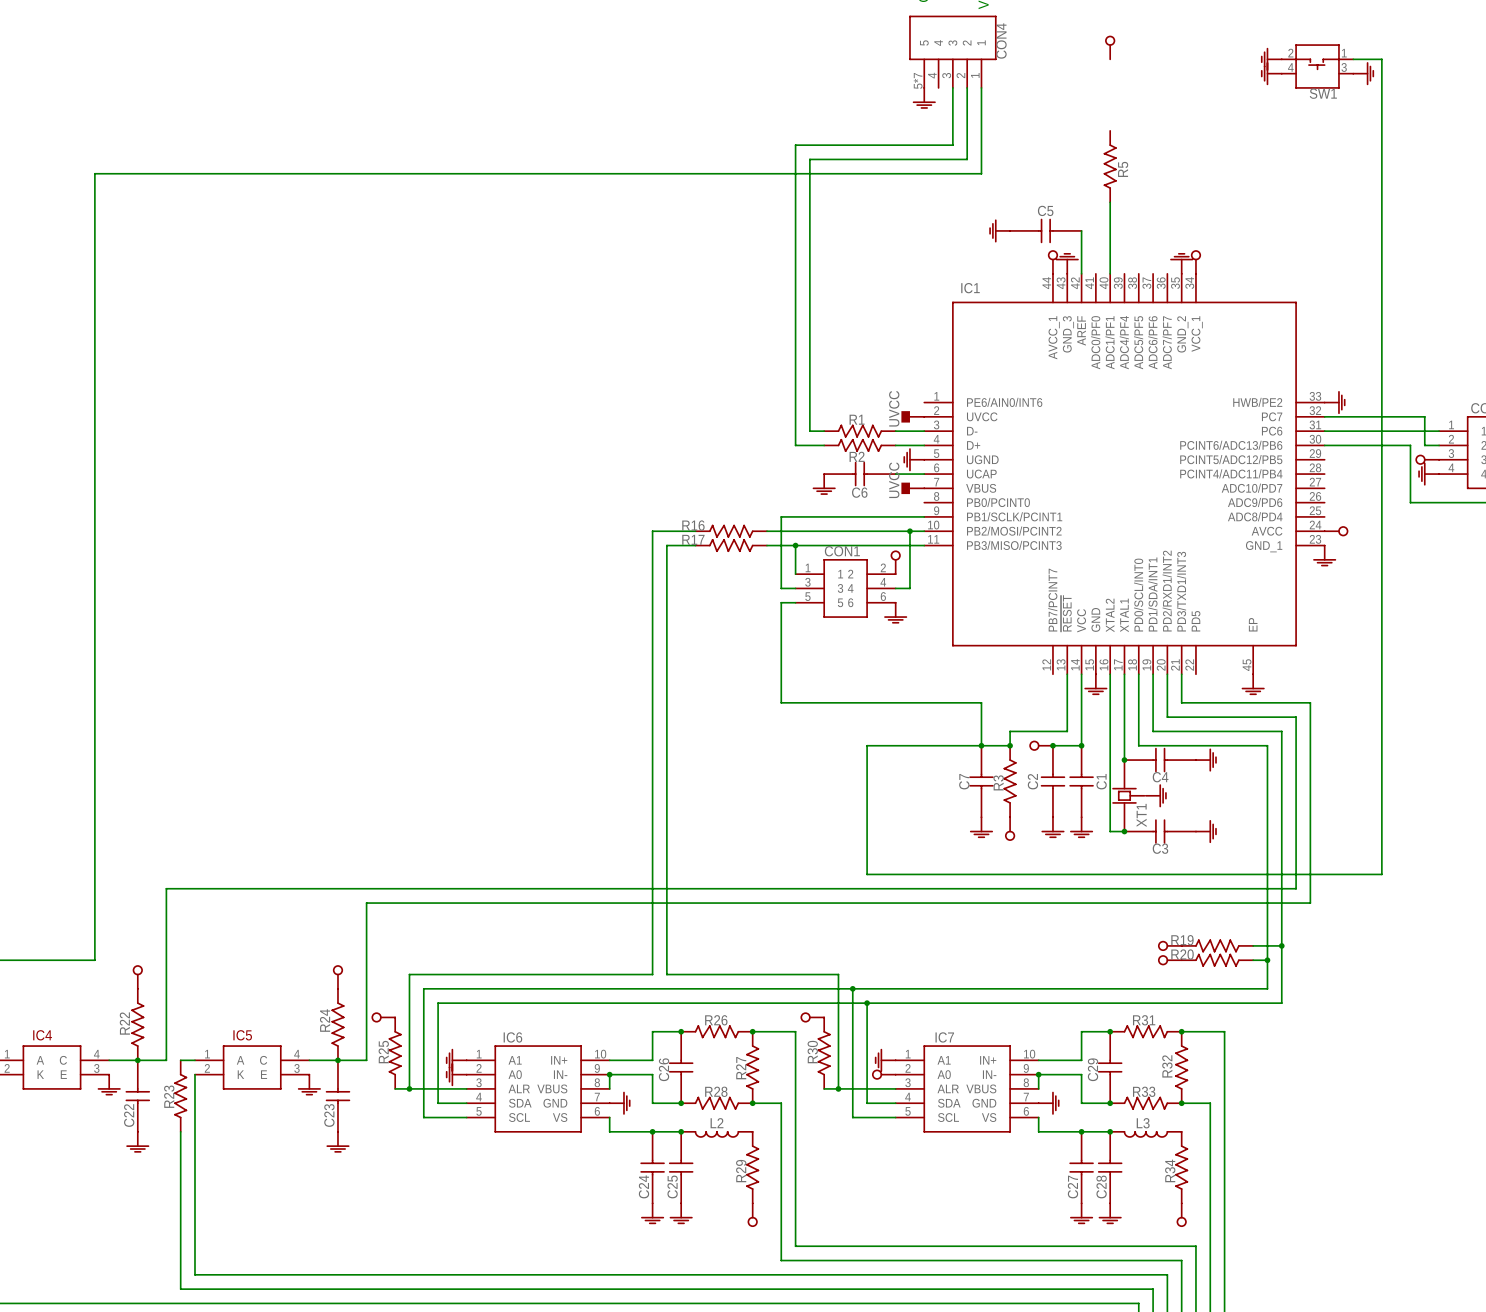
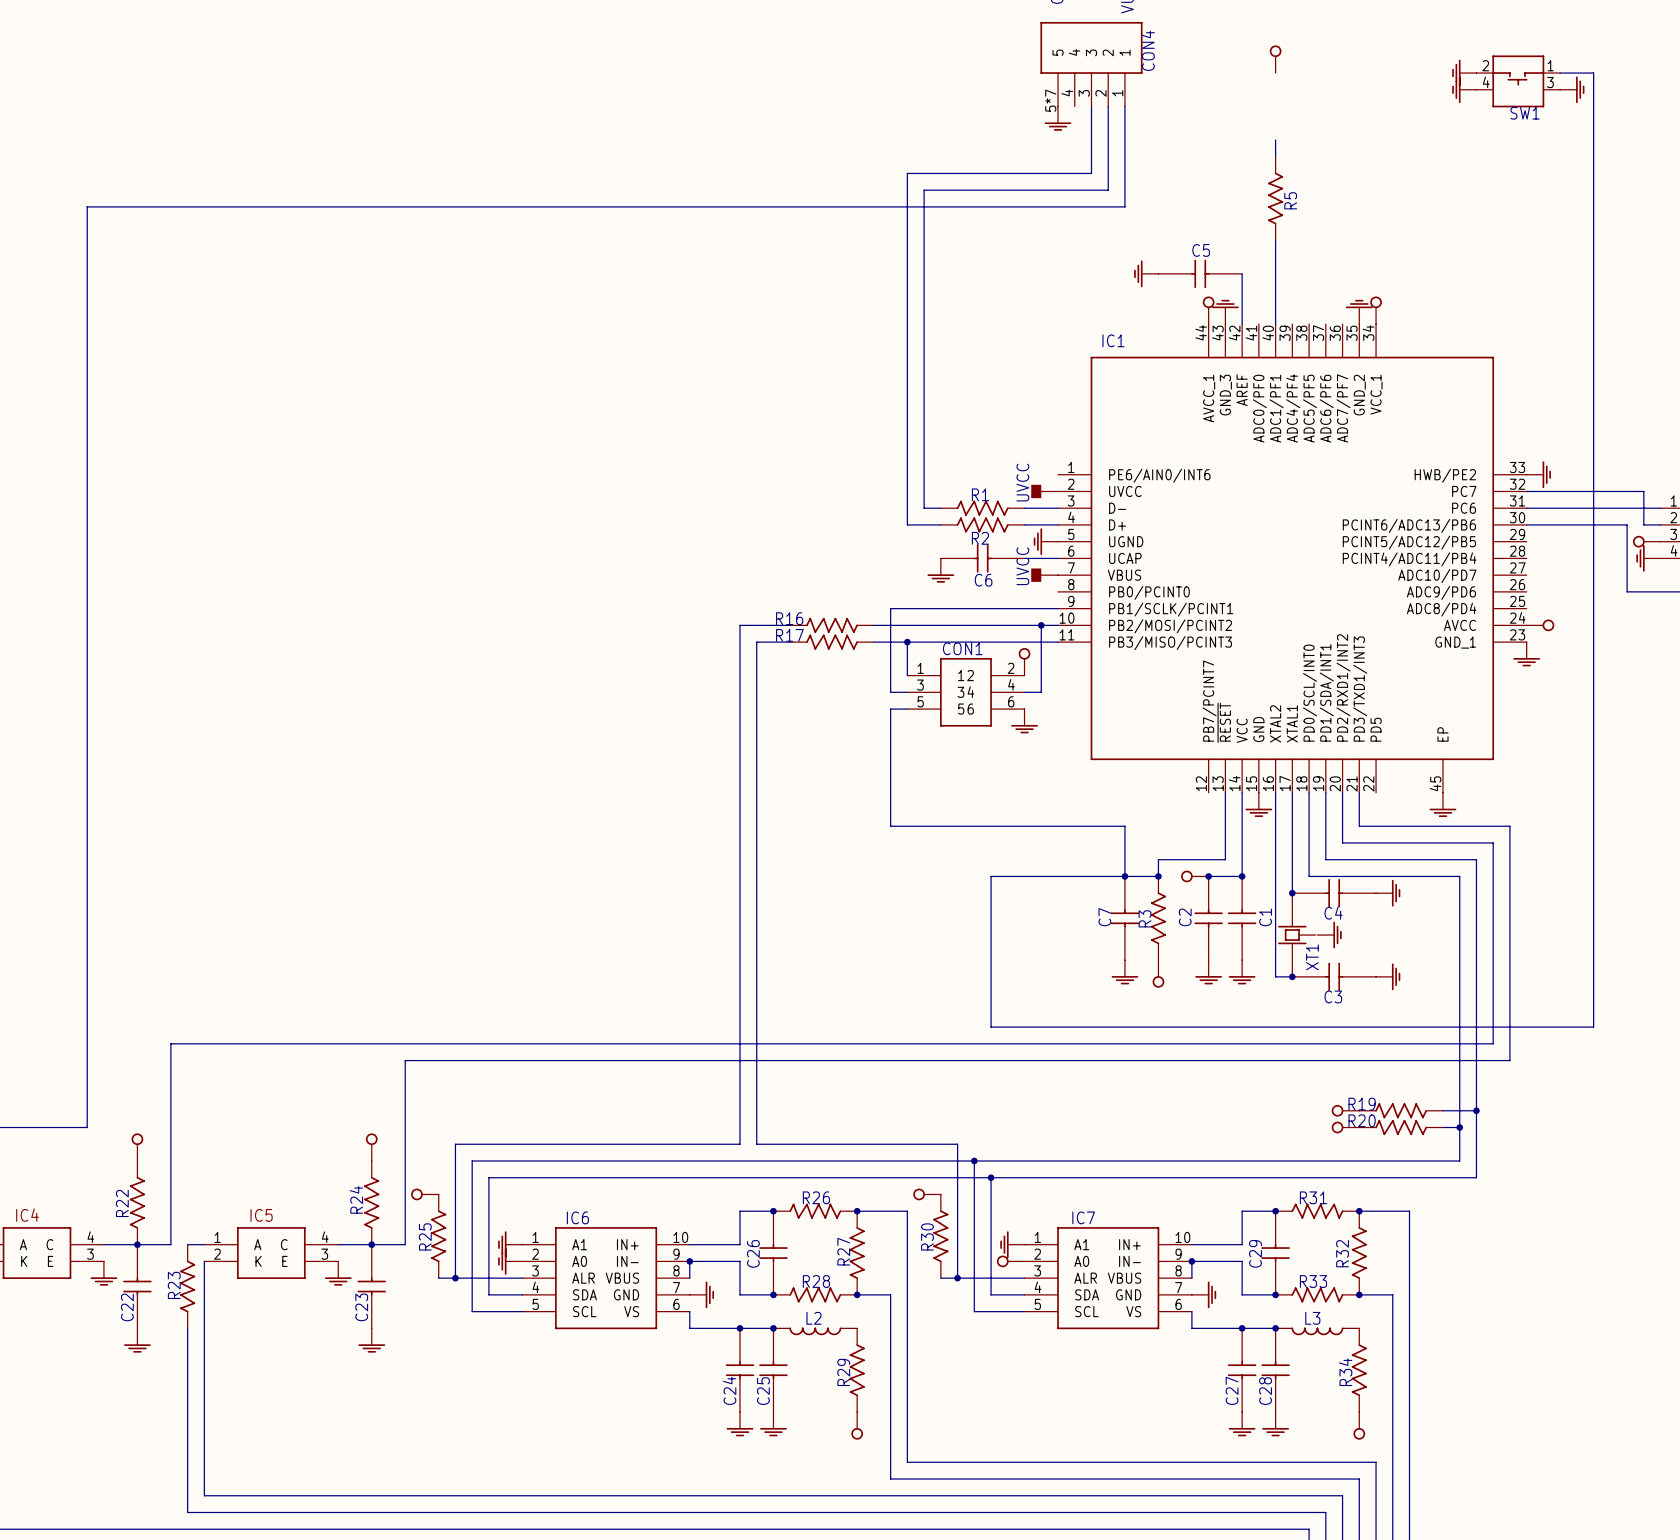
wire: none -> (1275, 139) (1275, 156)

